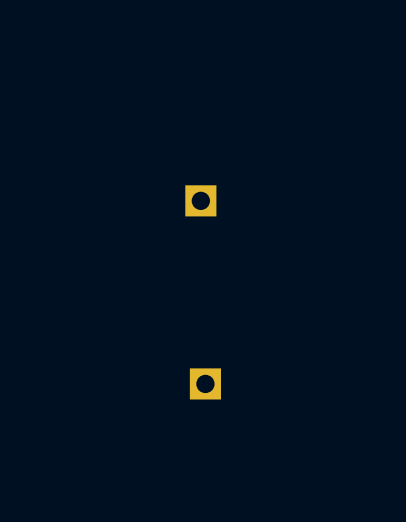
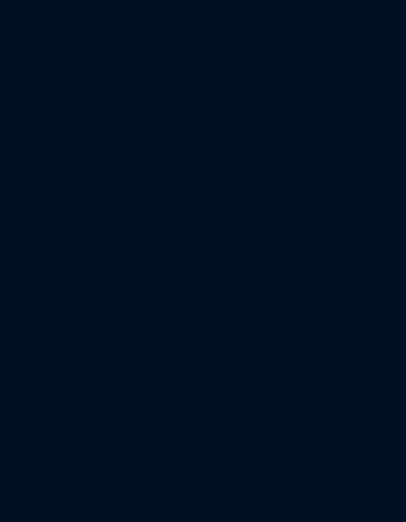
part: (200, 200) -> none
part: (205, 383) -> none

